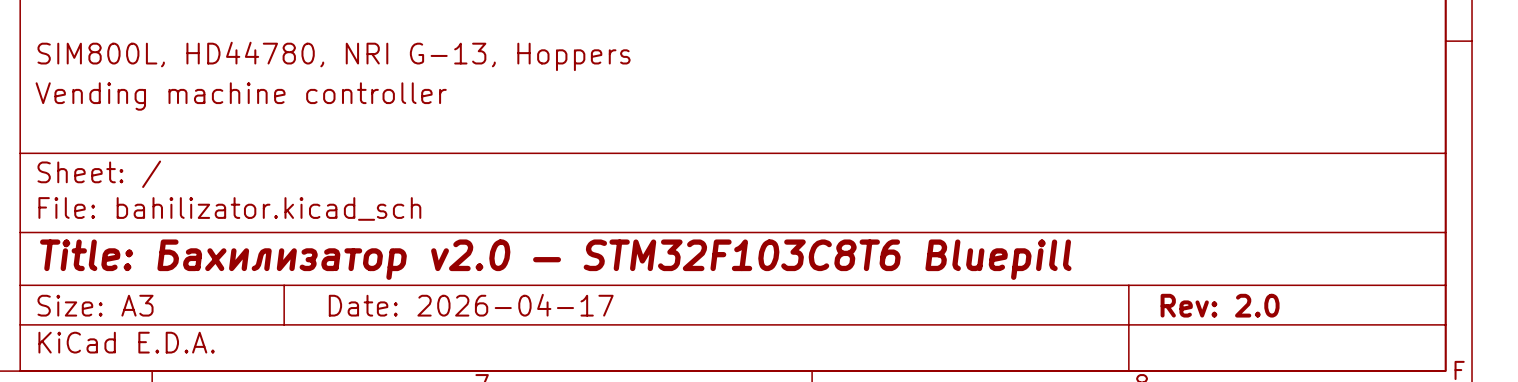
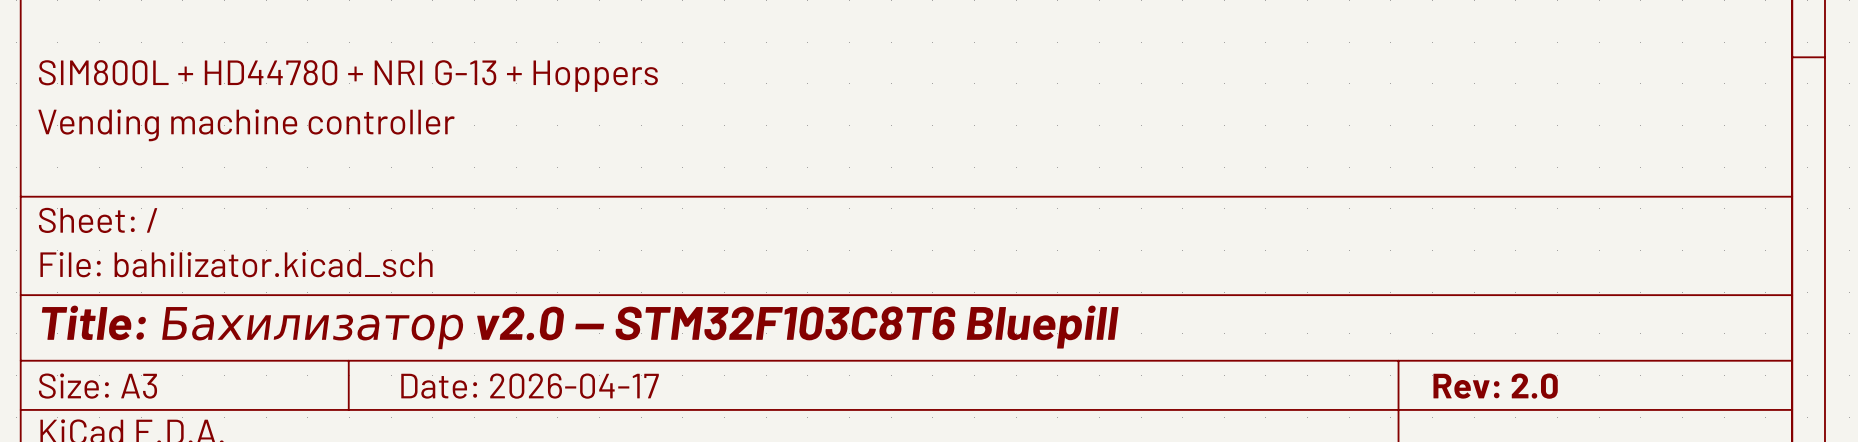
title block: SIM800L, HD44780, NRI G-13, Hoppers (334, 56) -> SIM800L + HD44780 + NRI G-13 + Hoppers (348, 76)

